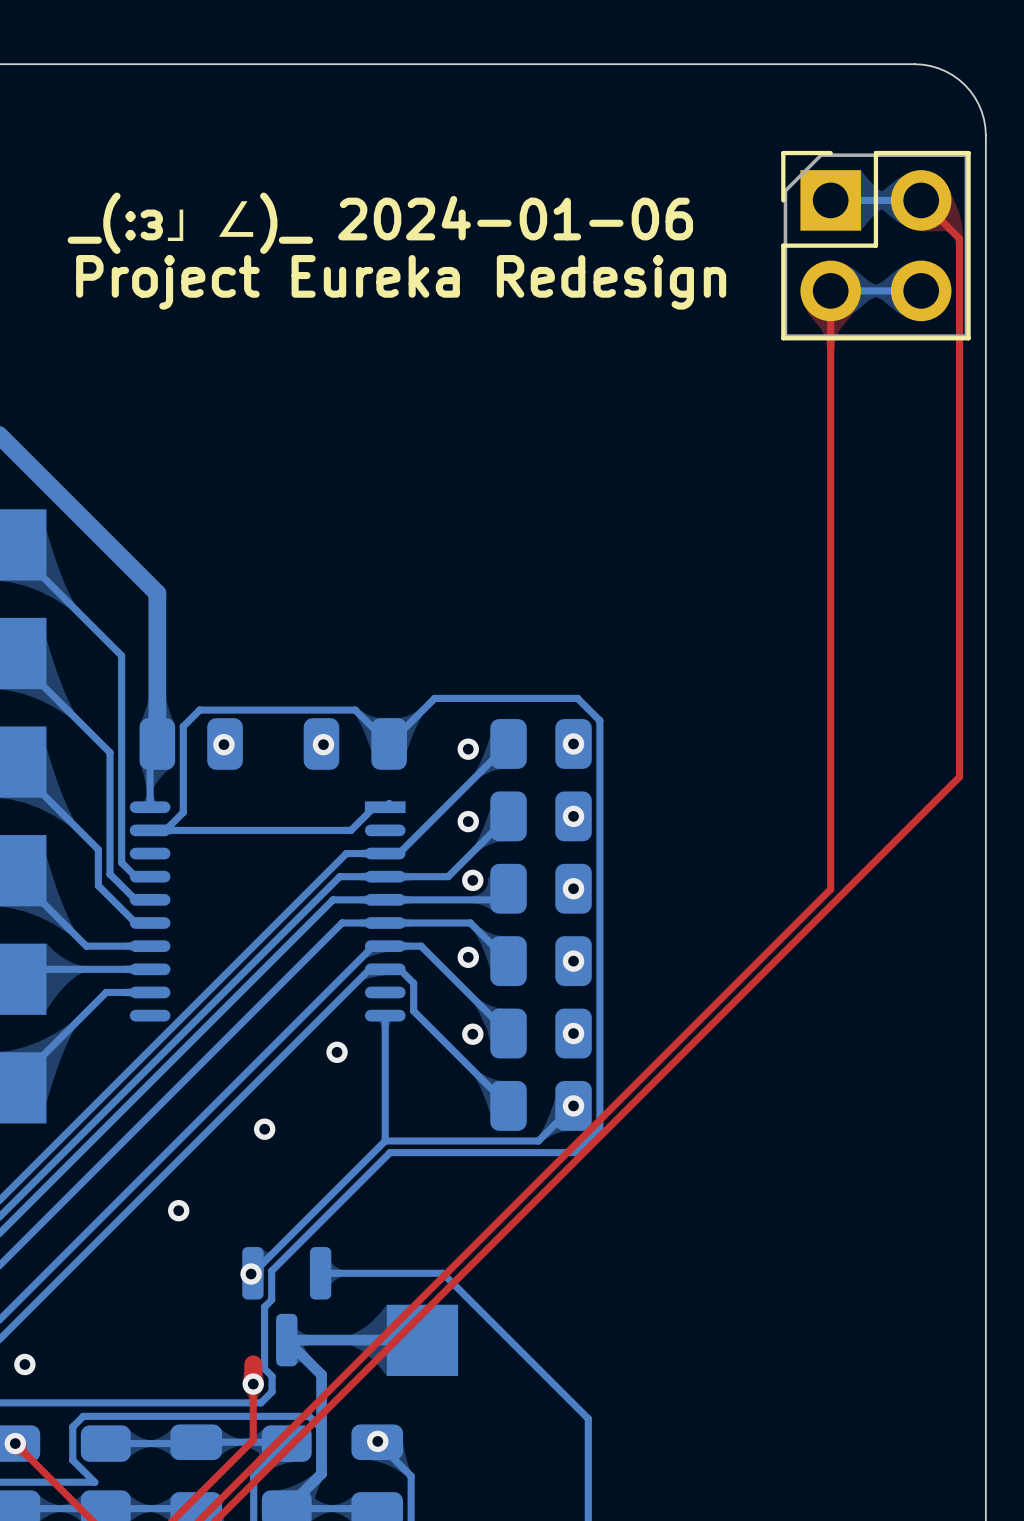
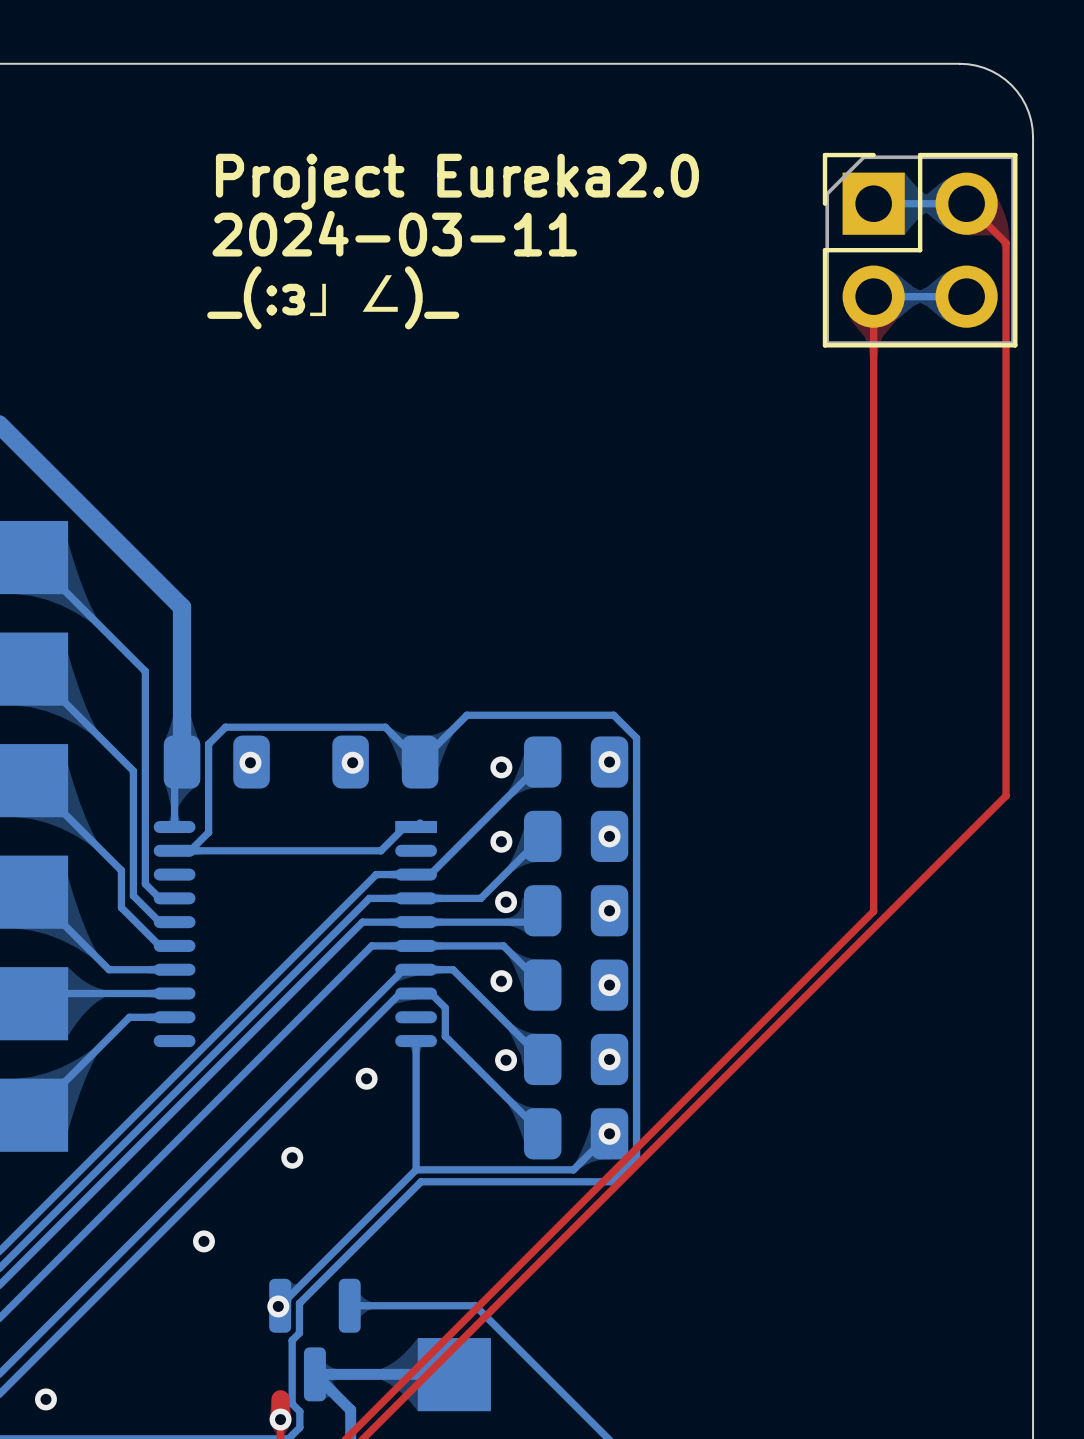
text: none -> Project Eureka2.0 (457, 181)
text: _(:з」∠)_ 2024-01-06 (380, 223) -> none
text: none -> 2024-03-11 (394, 233)
text: Project Eureka Redesign (401, 282) -> none
text: none -> _(:з」∠)_ (333, 297)

